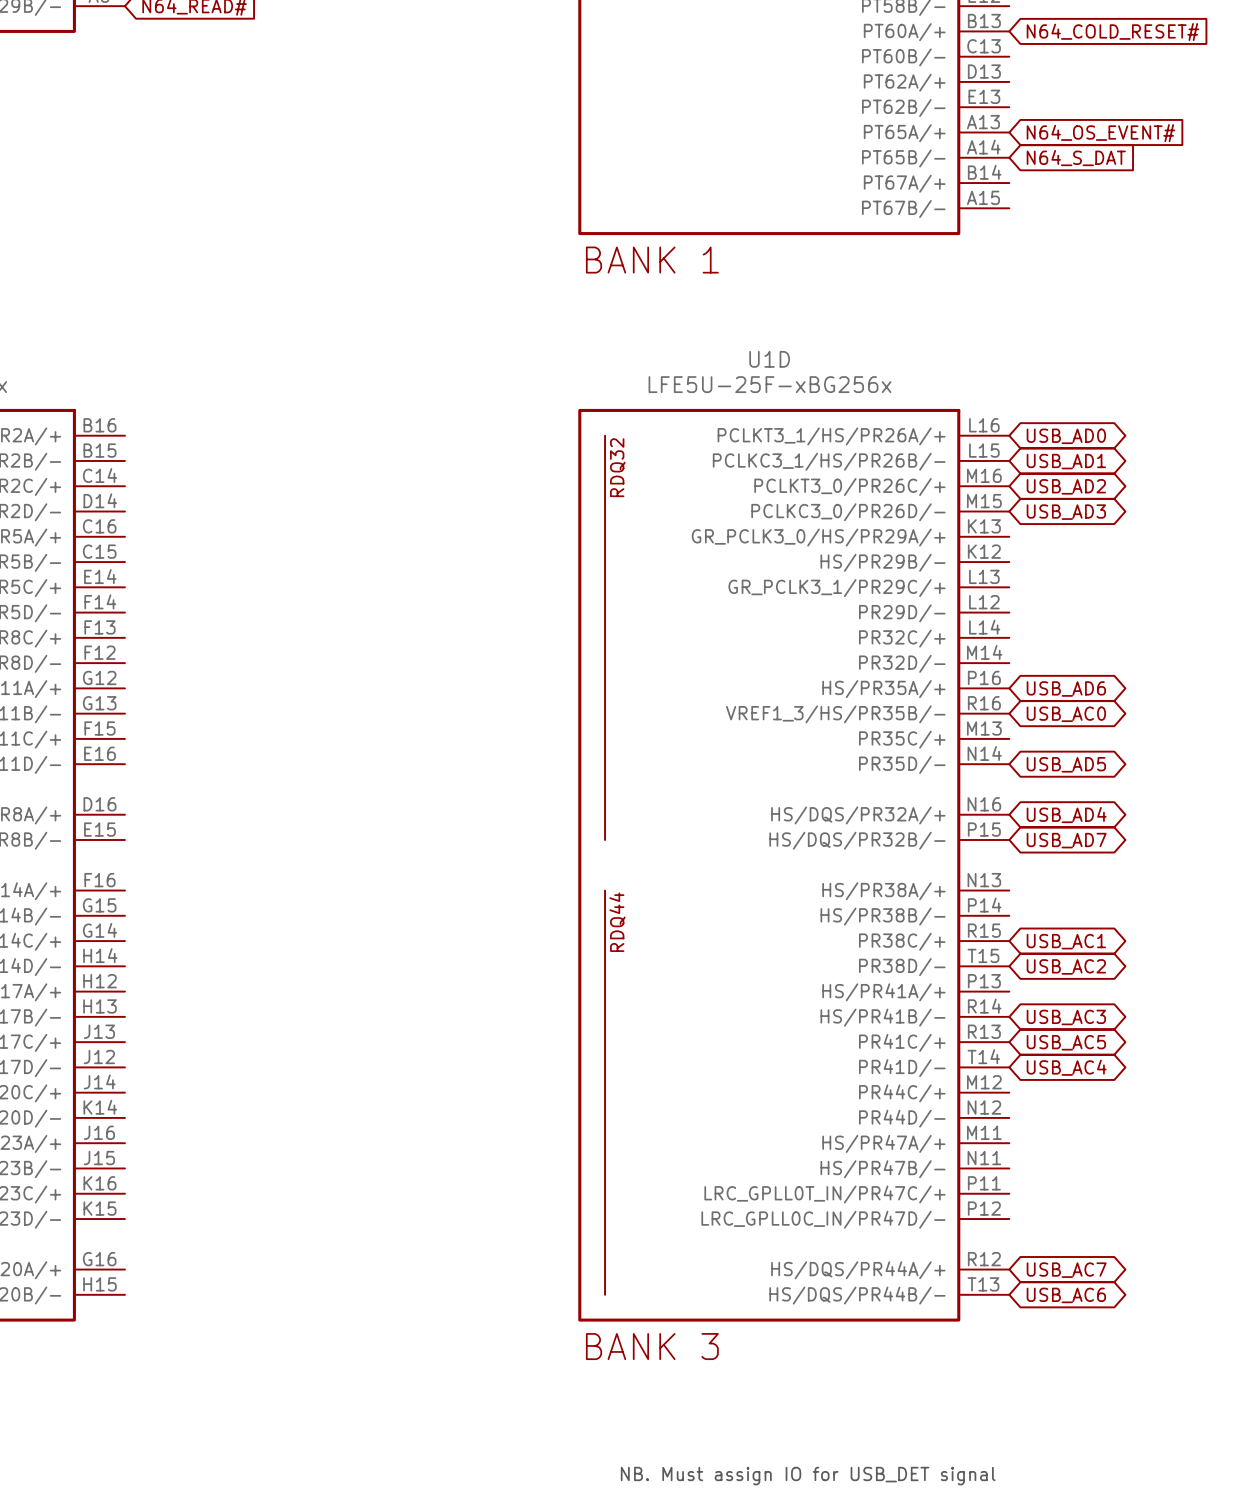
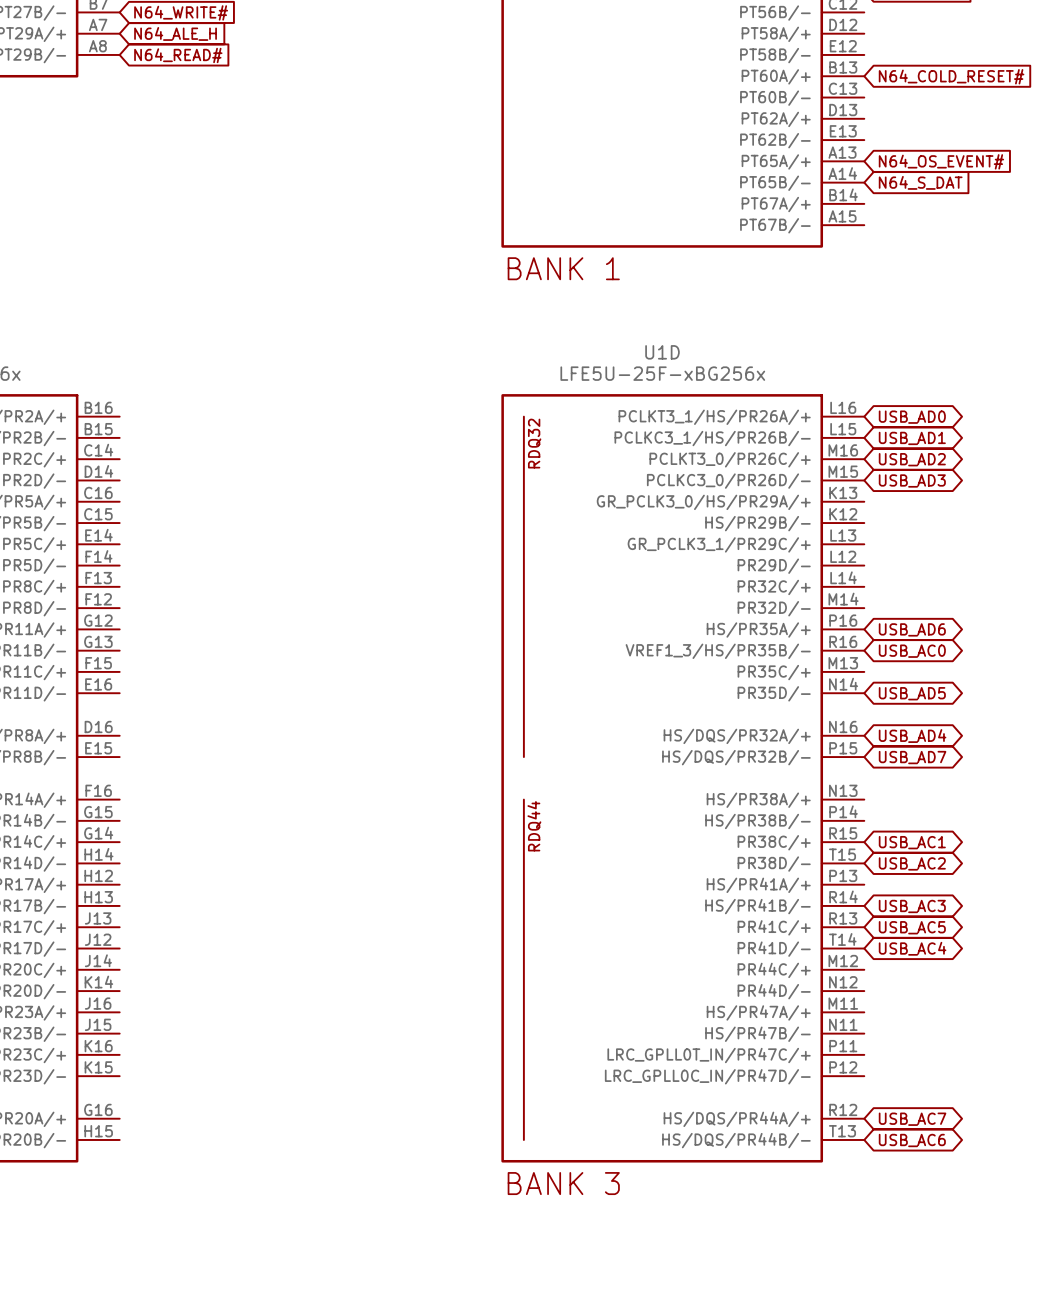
text: NB. Must assign IO for USB_DET signal (808, 1476) -> none

